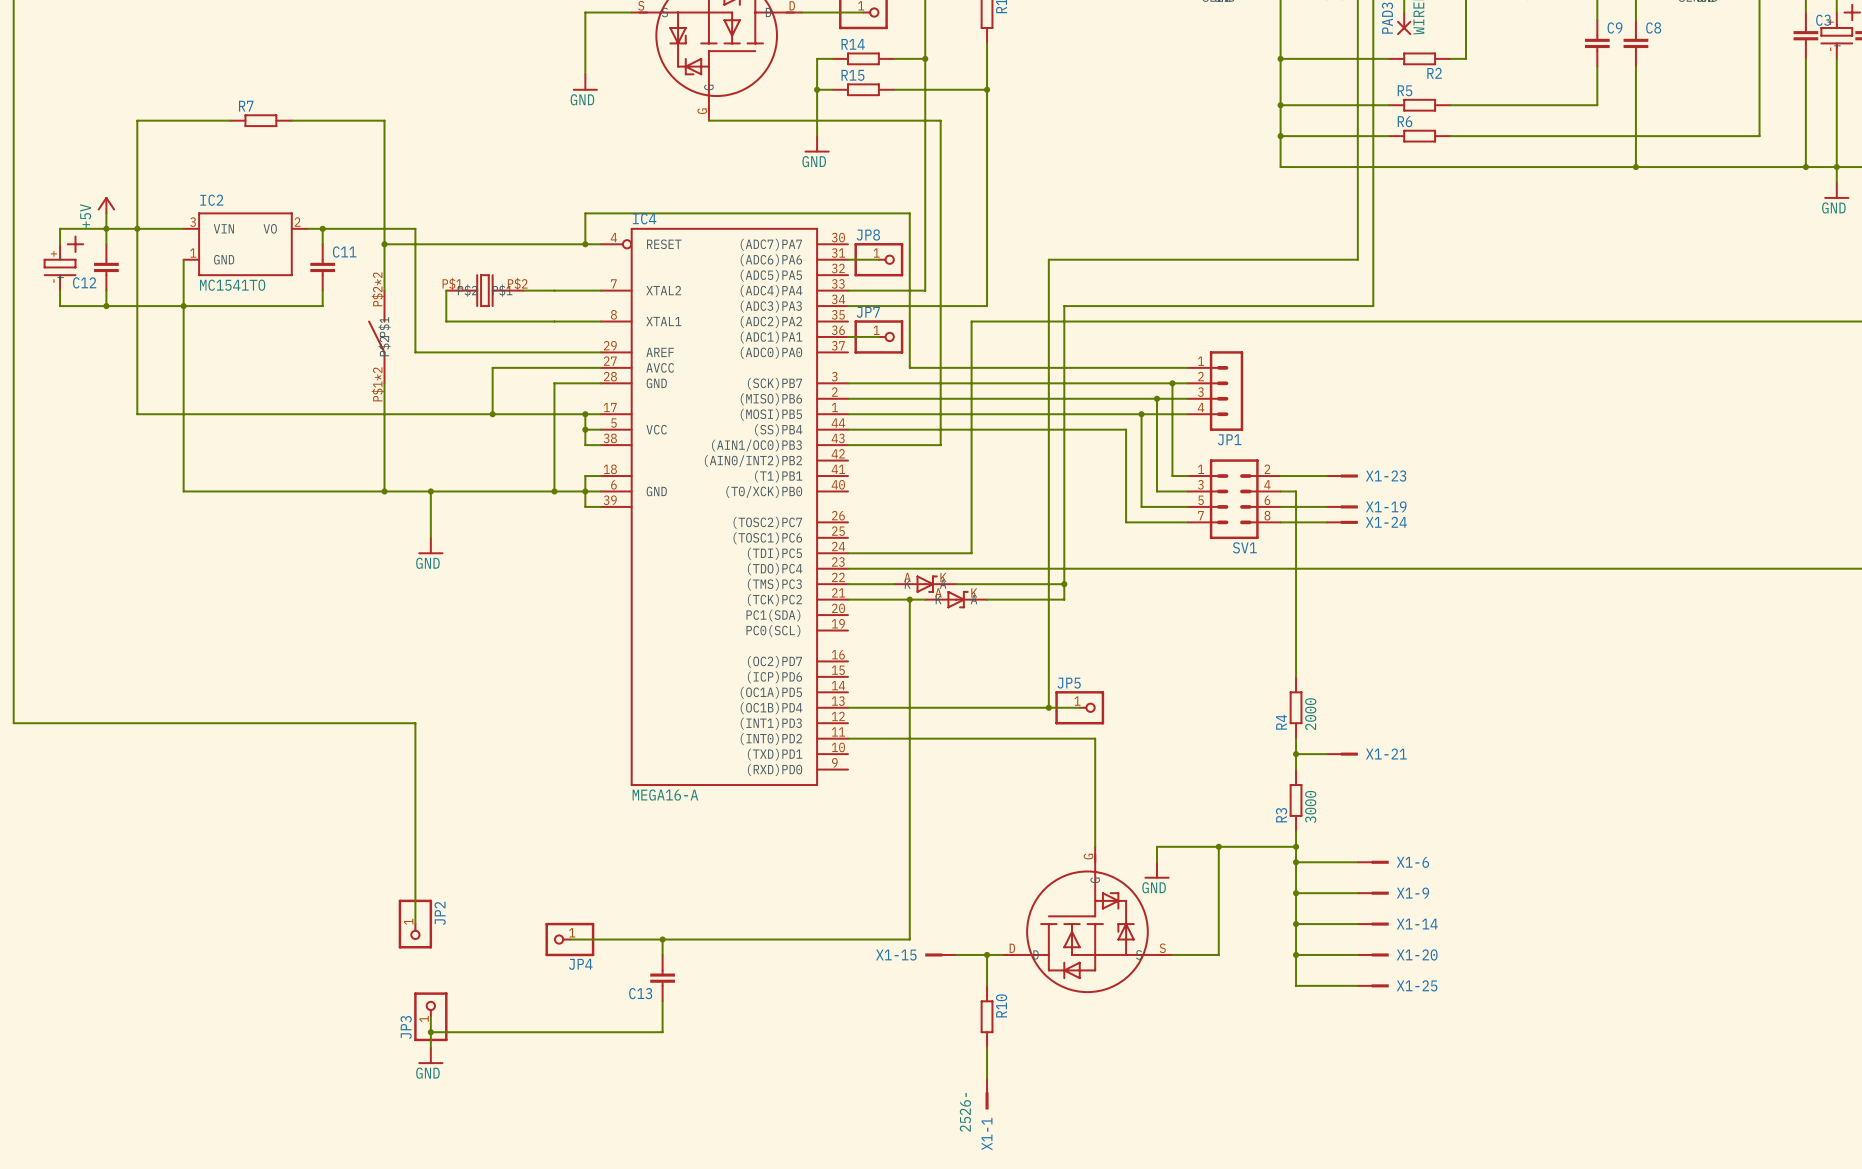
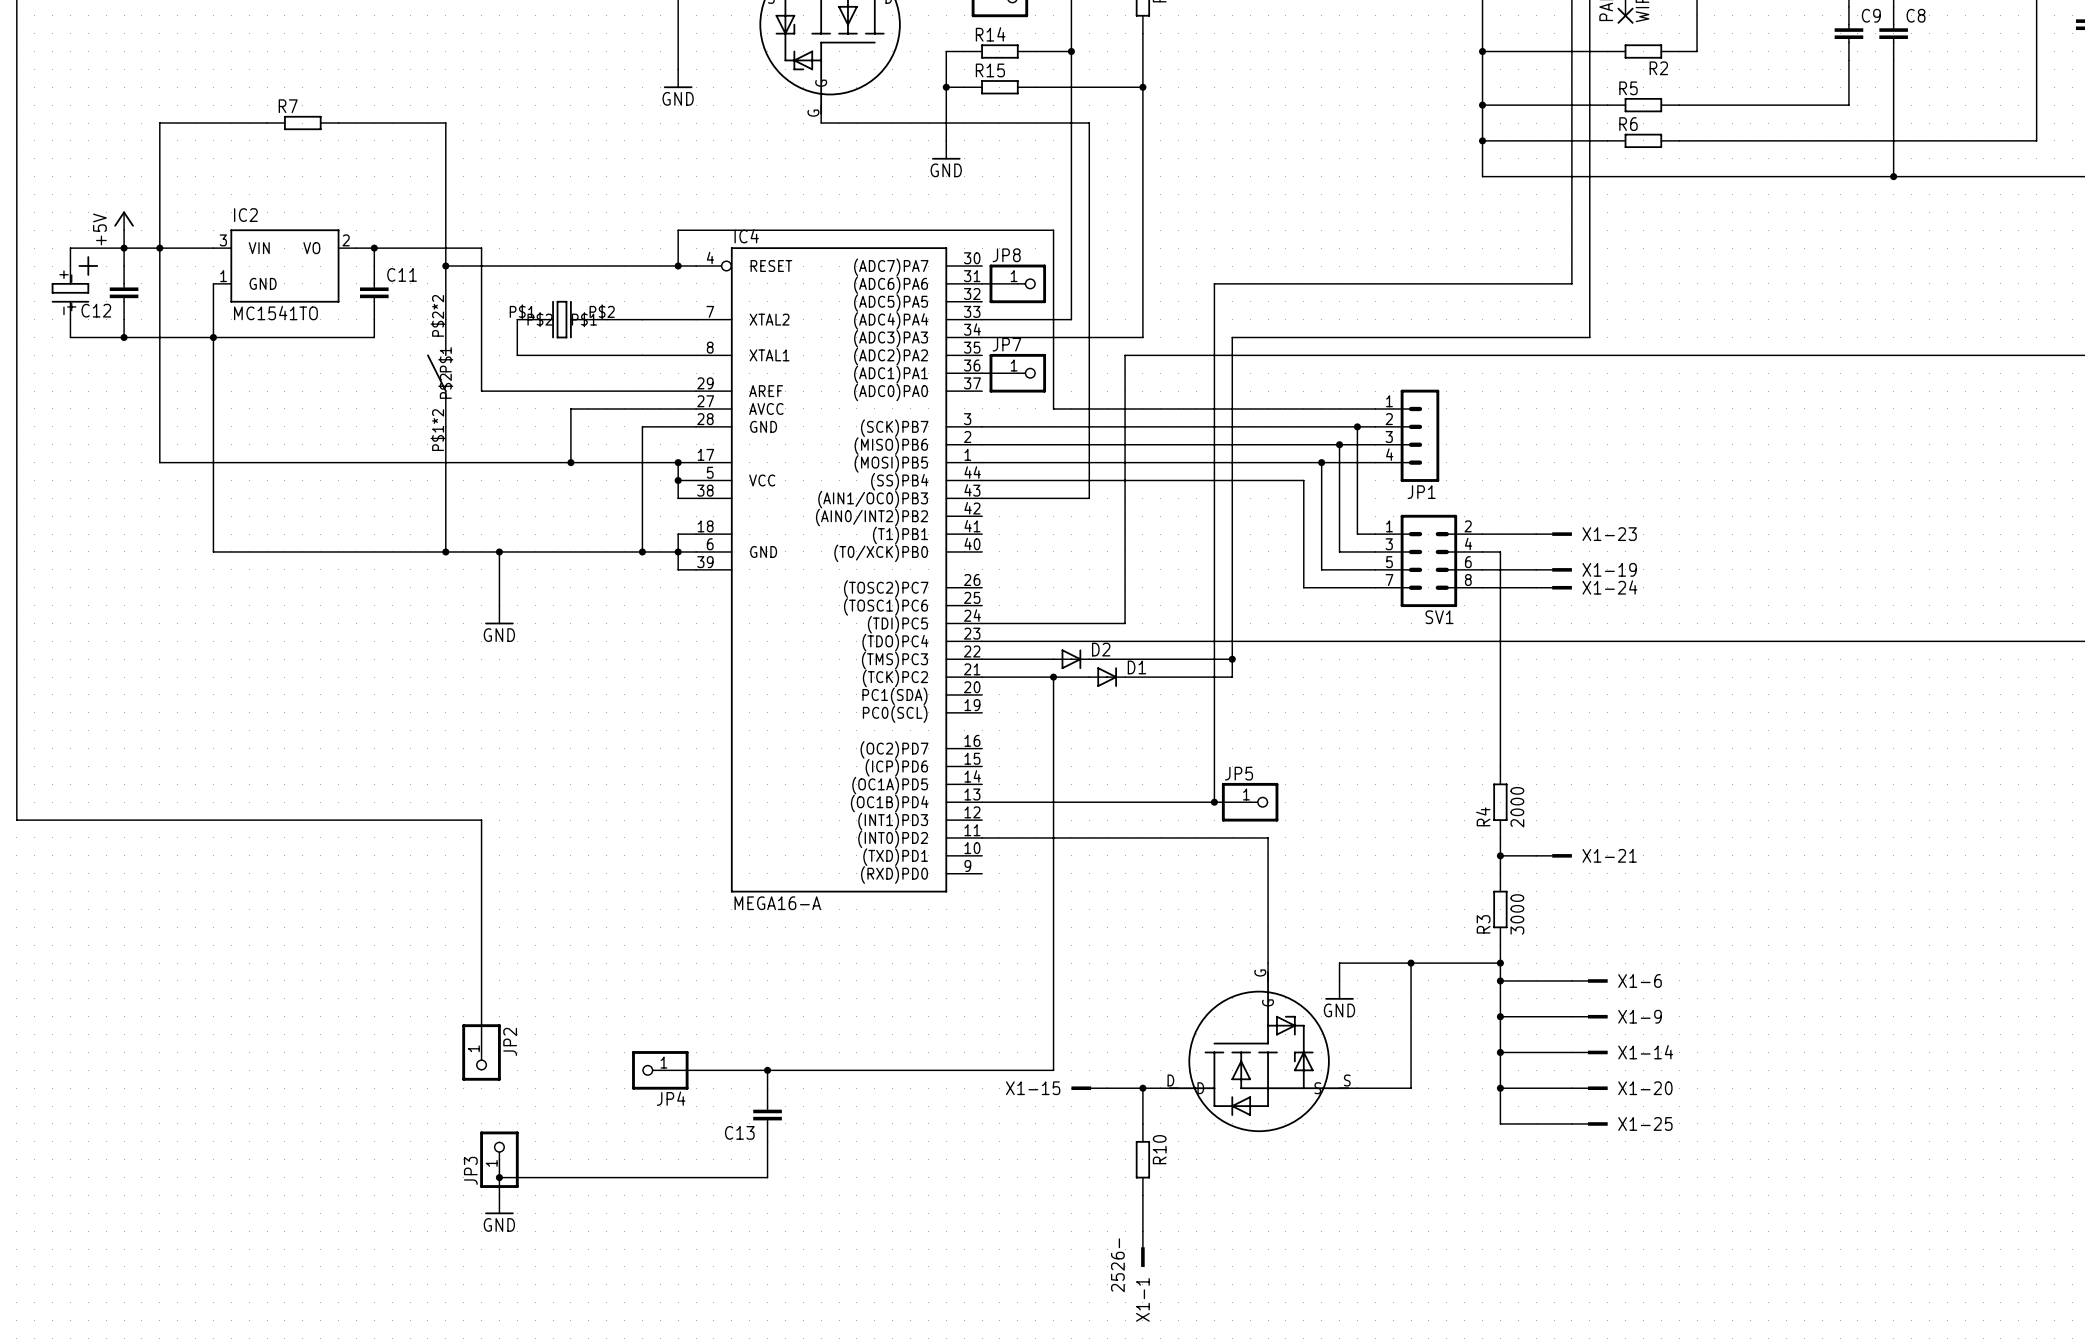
part: (925, 584) -> none
D2: none -> (1071, 659)
part: (956, 599) -> none
D1: none -> (1107, 677)

